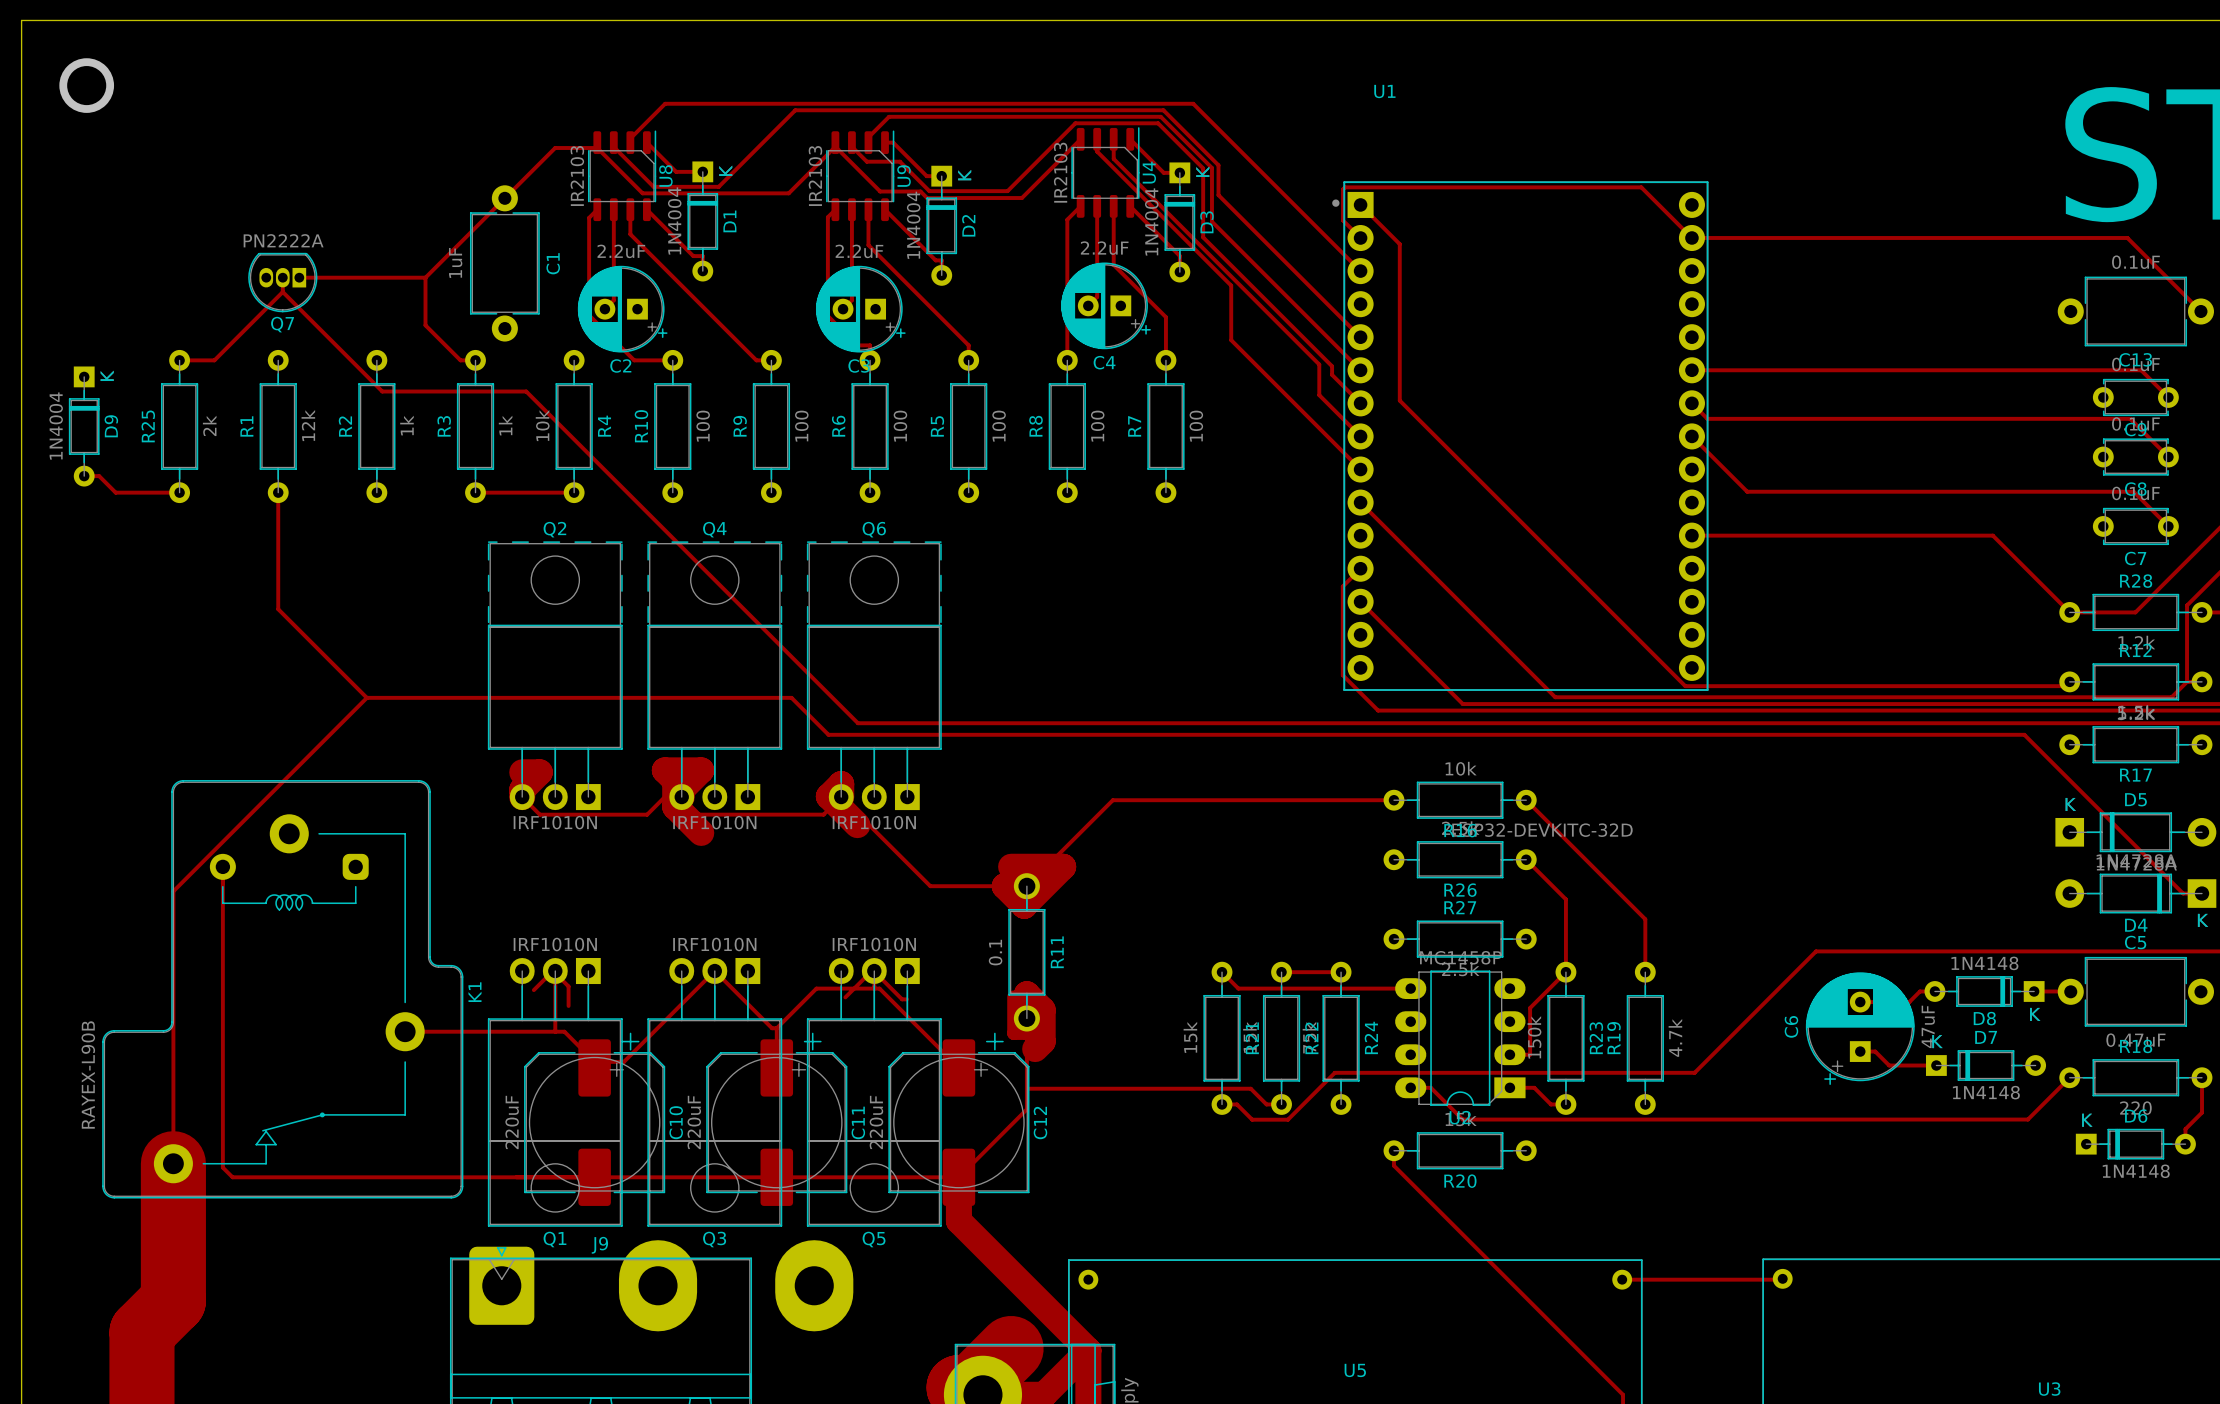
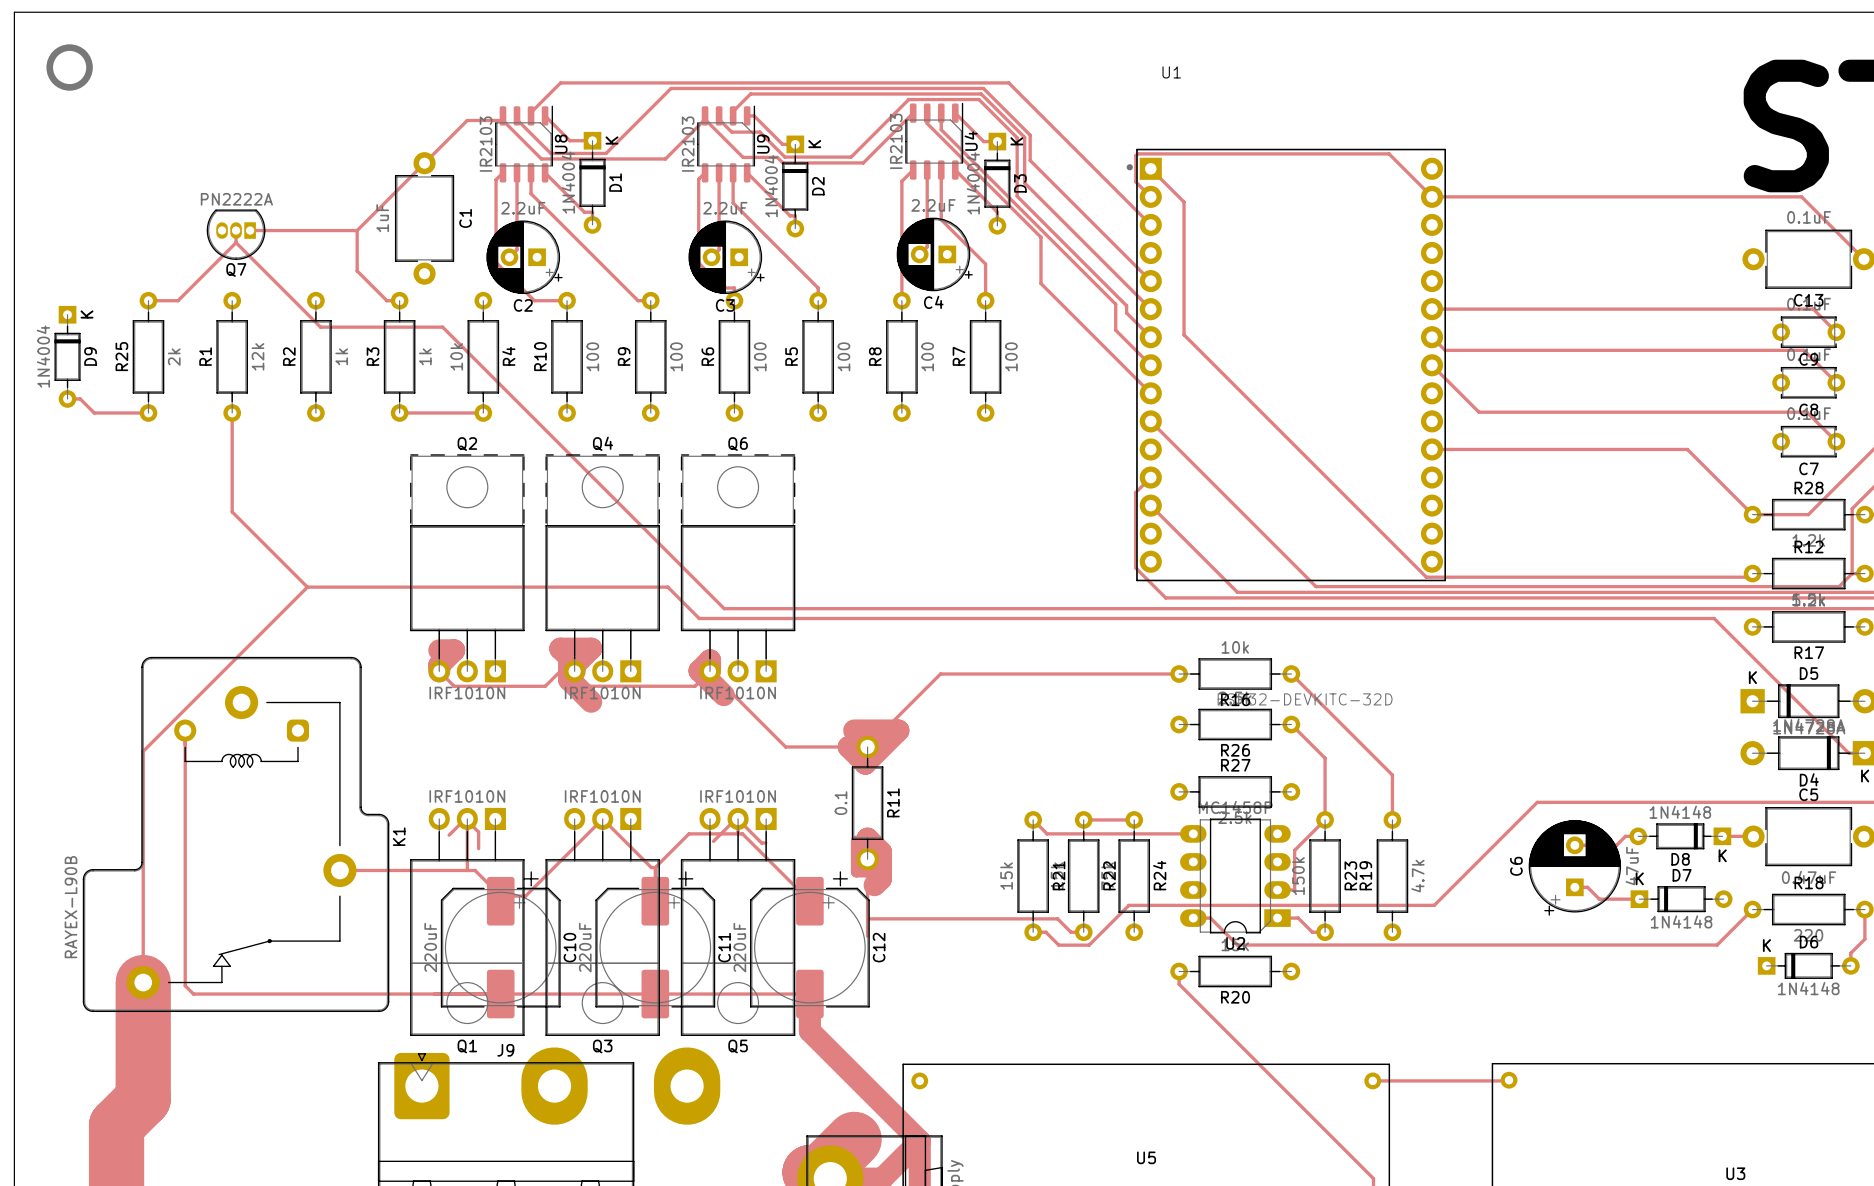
track: (1026, 1109) (958, 1177) -> none

